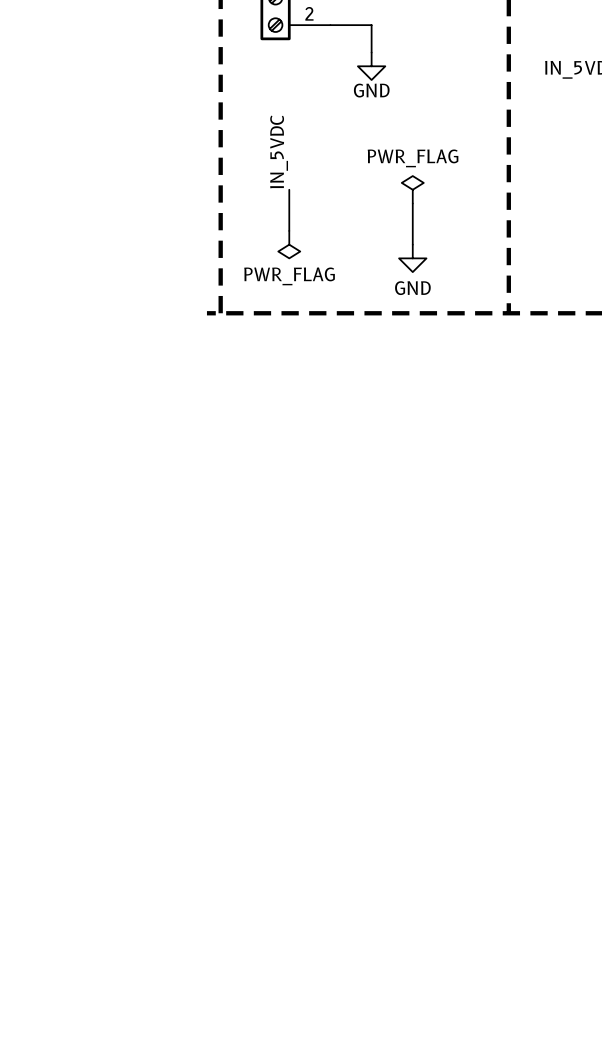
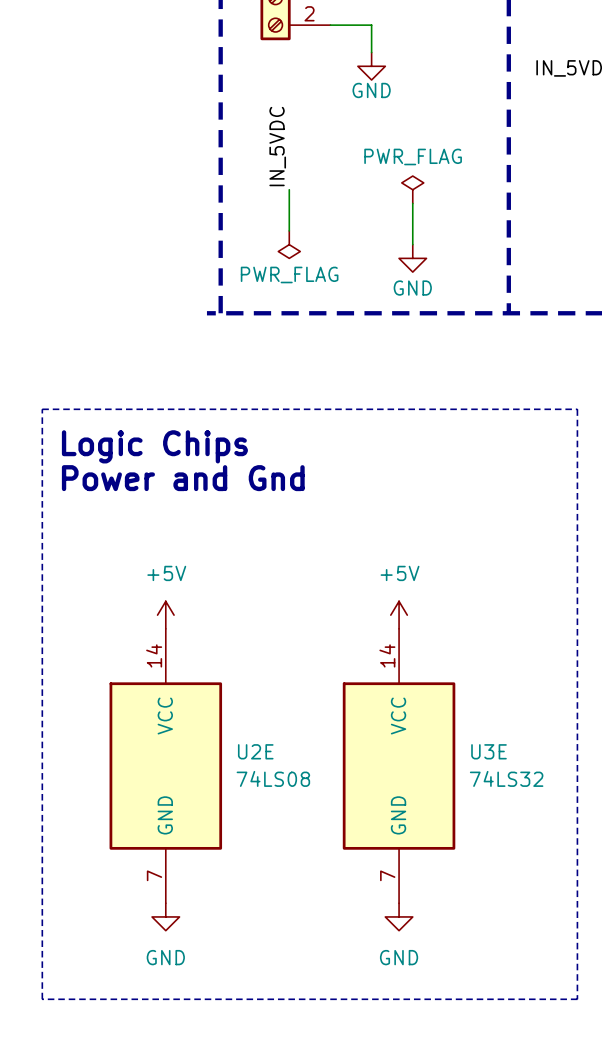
line: none -> (42, 409) (577, 409) (577, 999) (42, 999) (42, 409)
text: none -> Logic Chips (154, 446)
text: none -> Power and Gnd (183, 478)
power symbol: none -> +5V (165, 615)
power symbol: none -> +5V (399, 615)
U2E: none -> 74LS08 (165, 766)
U3E: none -> 74LS32 (399, 766)
power symbol: none -> GND (165, 916)
power symbol: none -> GND (399, 916)

